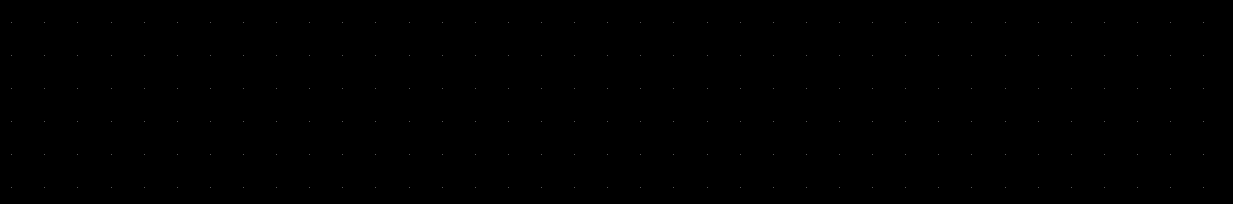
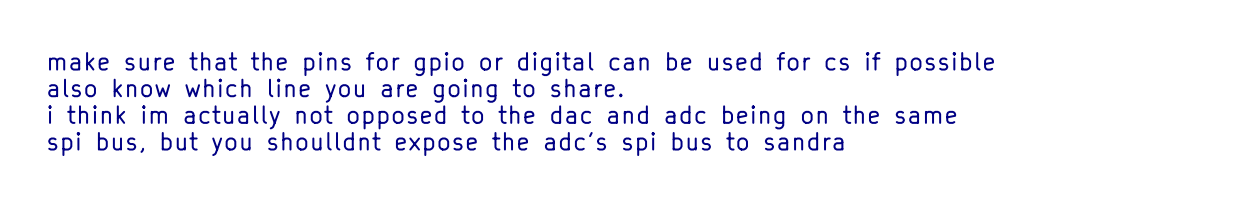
text: none -> make sure that the pins for gpio or digital can be used for cs if possible (521, 64)
text: none -> also know which line you are going to share. (335, 90)
text: none -> i think im actually not opposed to the dac and adc being on the same (502, 117)
text: none -> spi bus, but you shoulldnt expose the adc's spi bus to sandra (445, 144)

